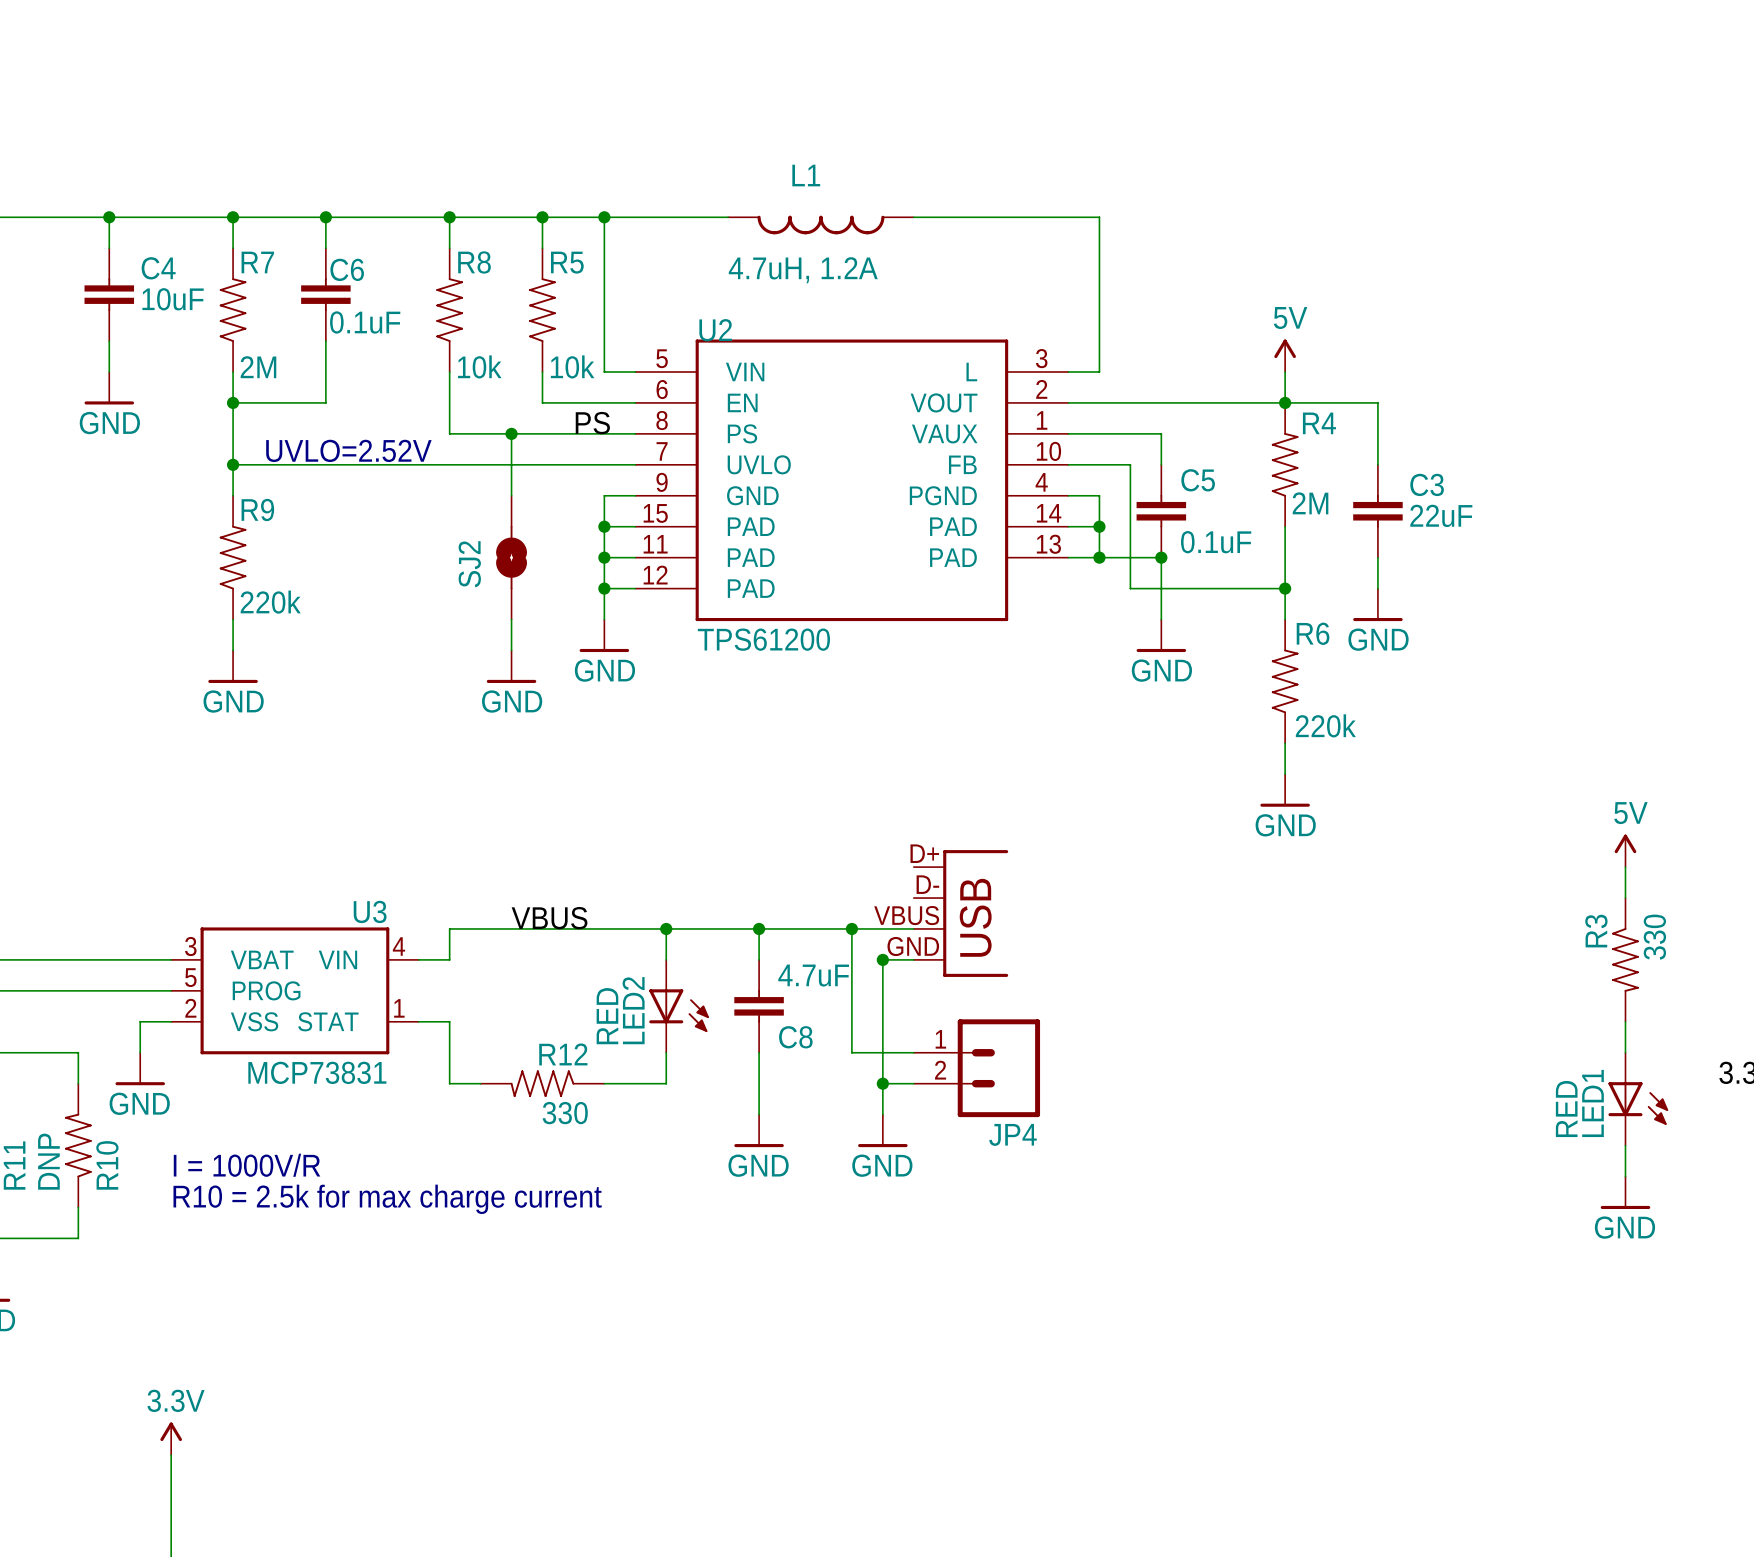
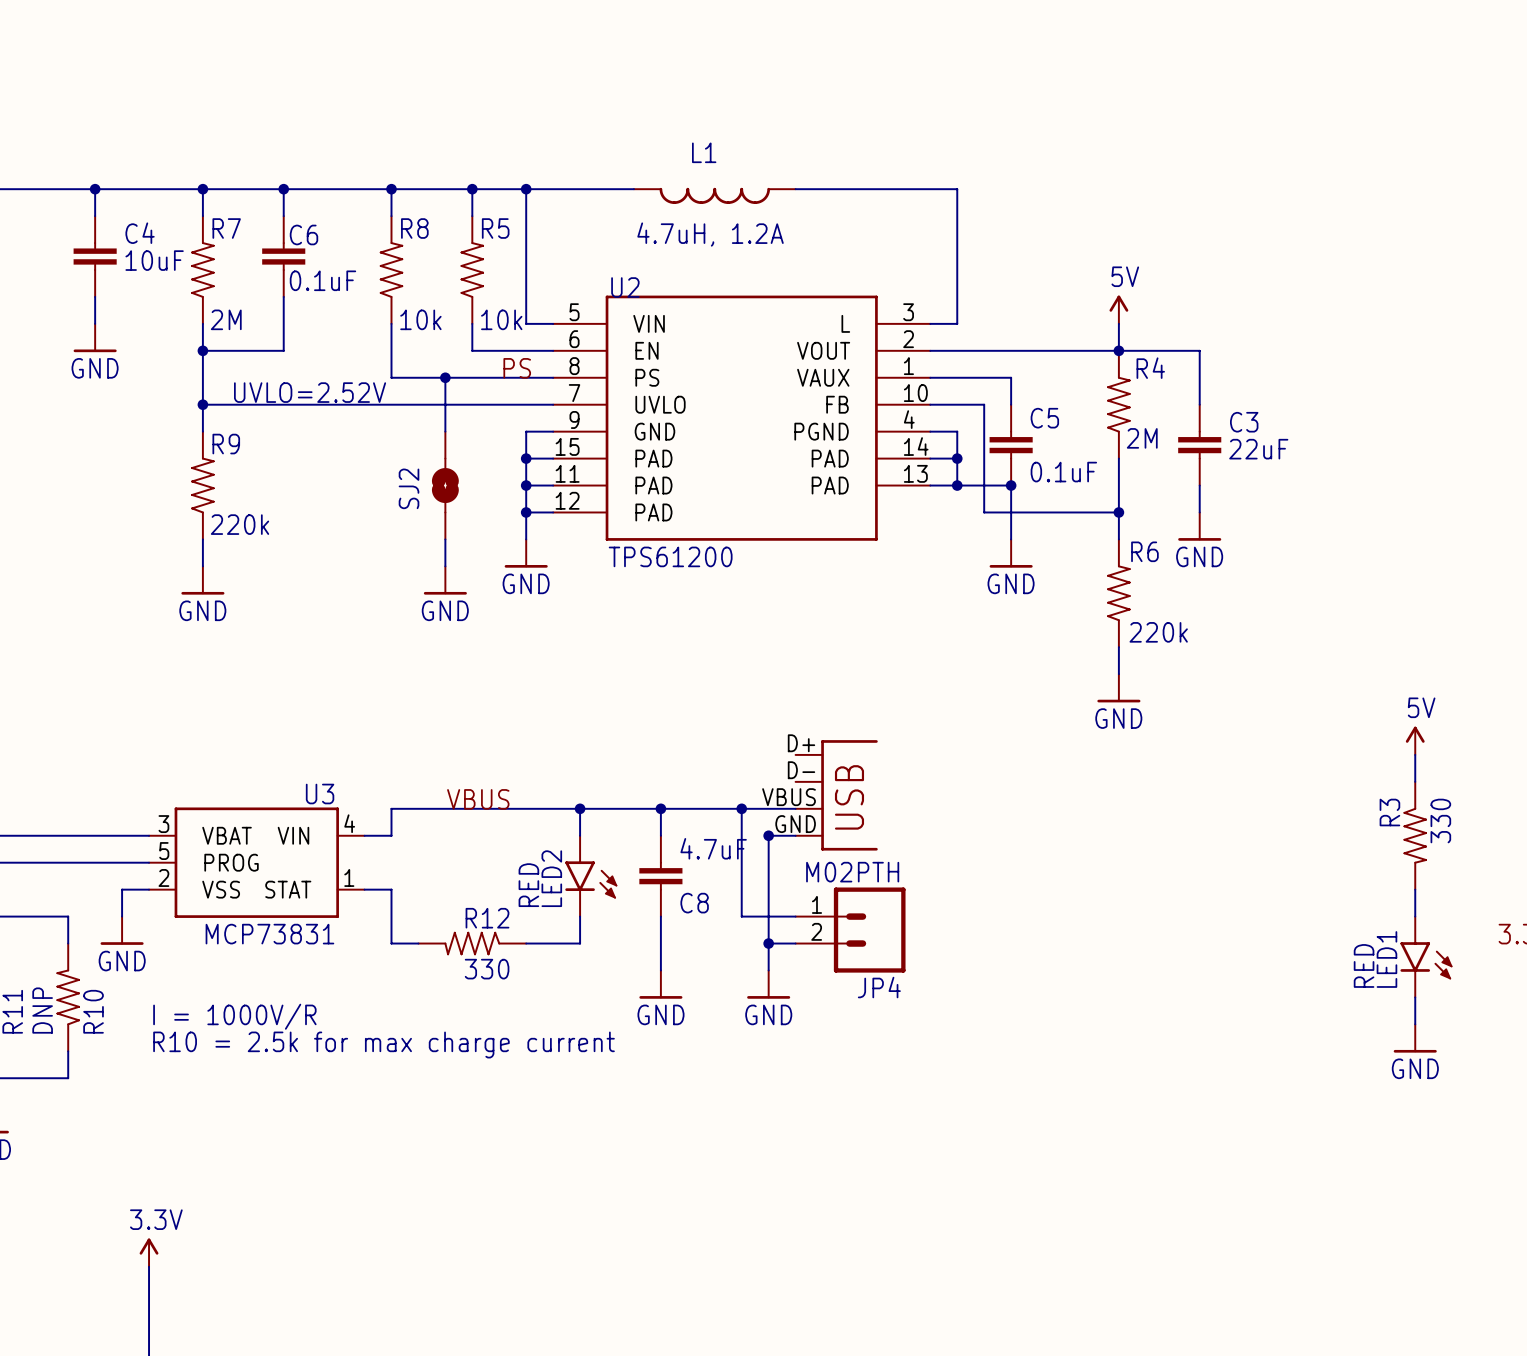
LED2 symbol: [649, 959, 709, 1053] -> [565, 835, 618, 917]
JP4 value: none -> M02PTH (852, 872)
LED1 symbol: [1608, 1052, 1669, 1146] -> [1400, 916, 1453, 998]

